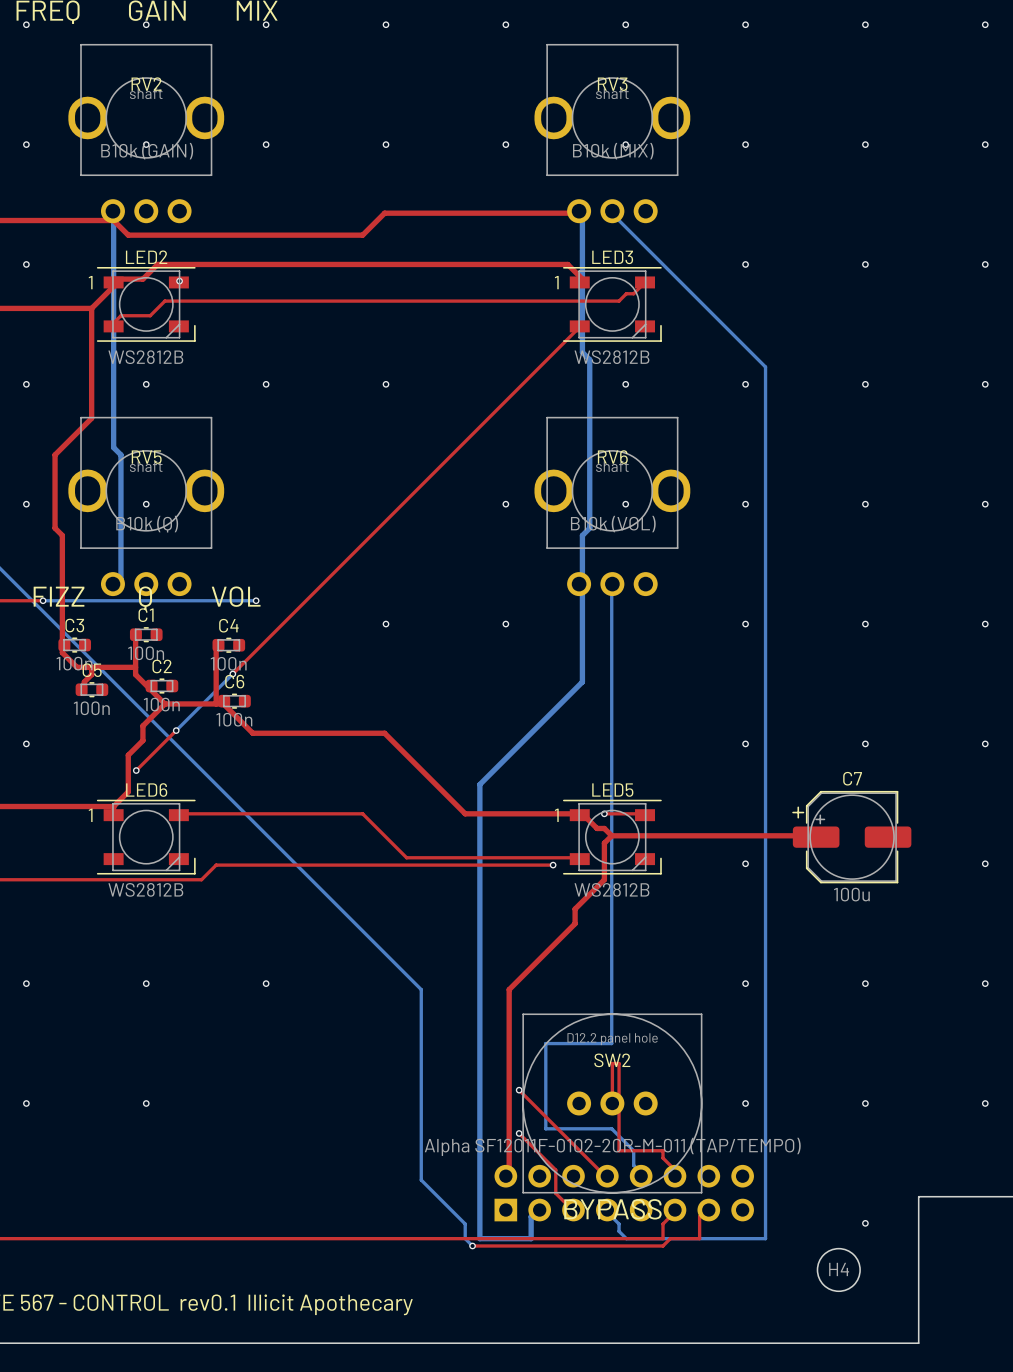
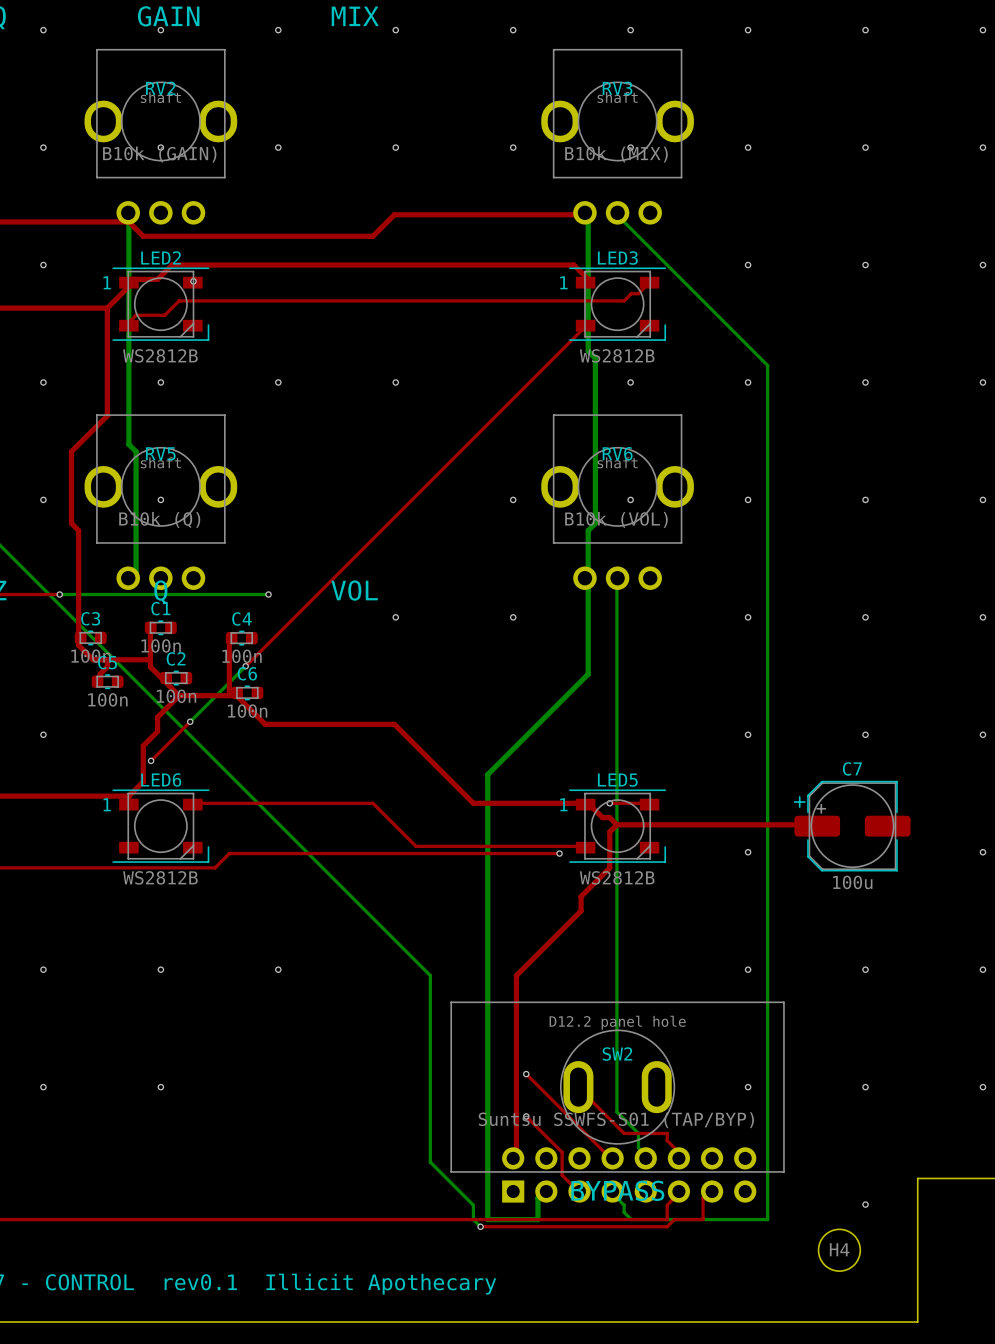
SW2 footprint: [522, 1013, 703, 1194] -> [450, 1001, 785, 1173]
bottom track: (611, 1043) (545, 1043) (545, 1128) (611, 1128) -> (616, 1028) (616, 1111)
top track: (612, 1103) (612, 1063) (619, 1063) (619, 1150) -> (581, 1090) (624, 1133)
SW2 value: Alpha SF12011F-0102-20R-M-011 (TAP/TEMPO) (612, 1146) -> Suntsu SSWFS-S01 (TAP/BYP) (616, 1120)

